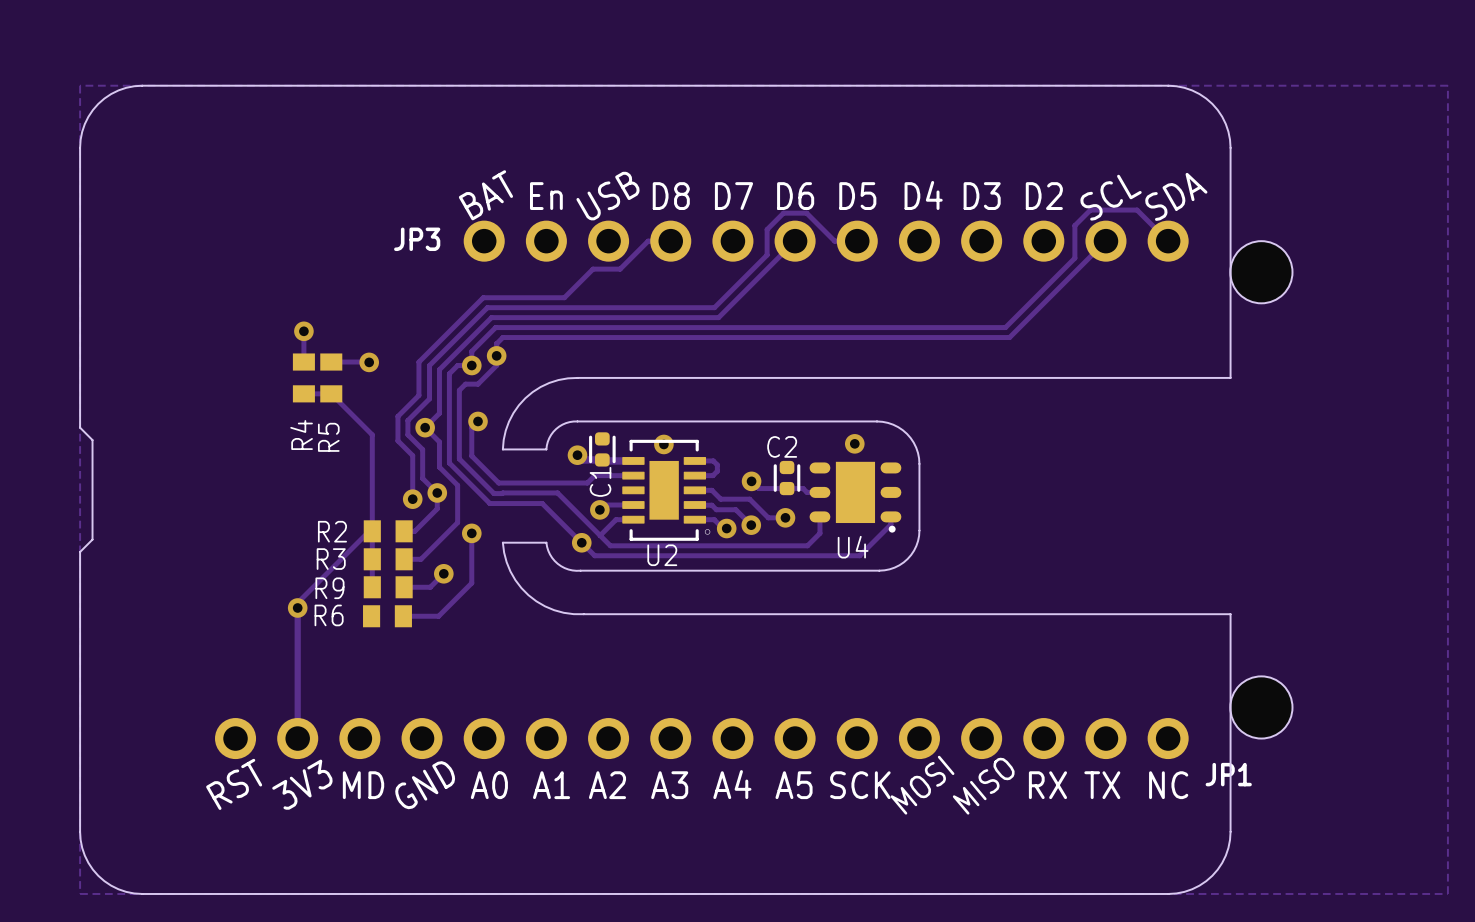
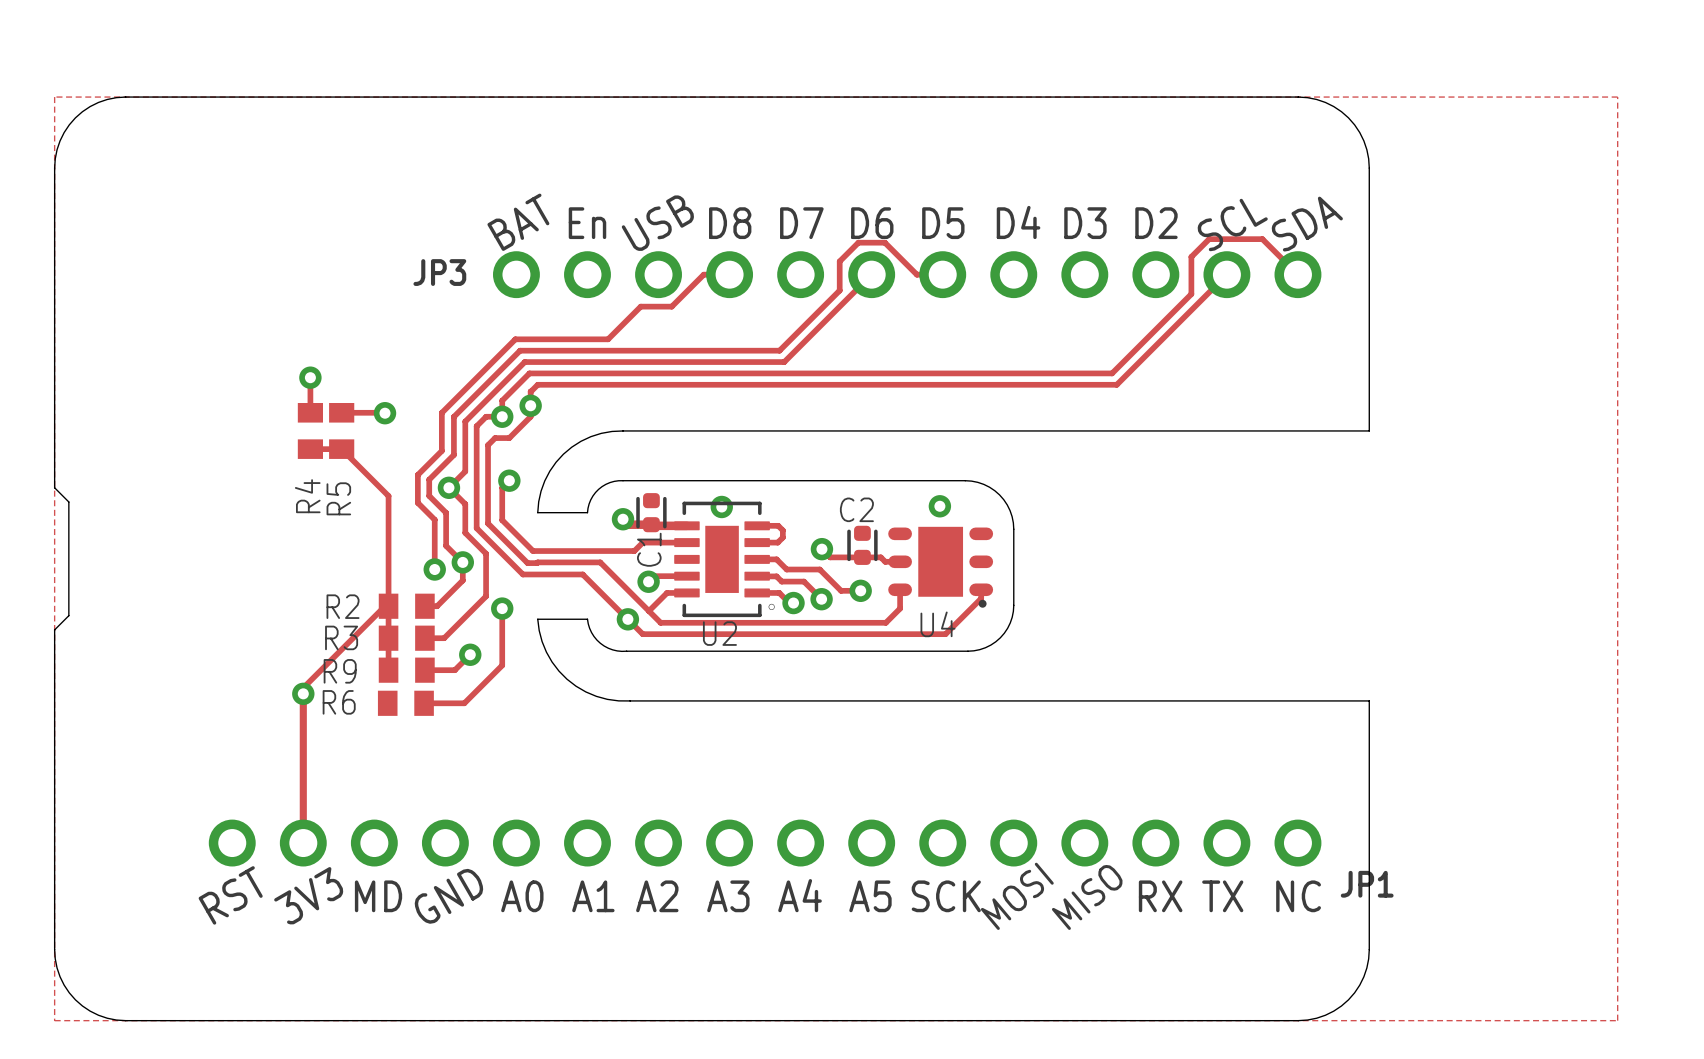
hole: (1261, 272) -> none
hole: (1261, 707) -> none

